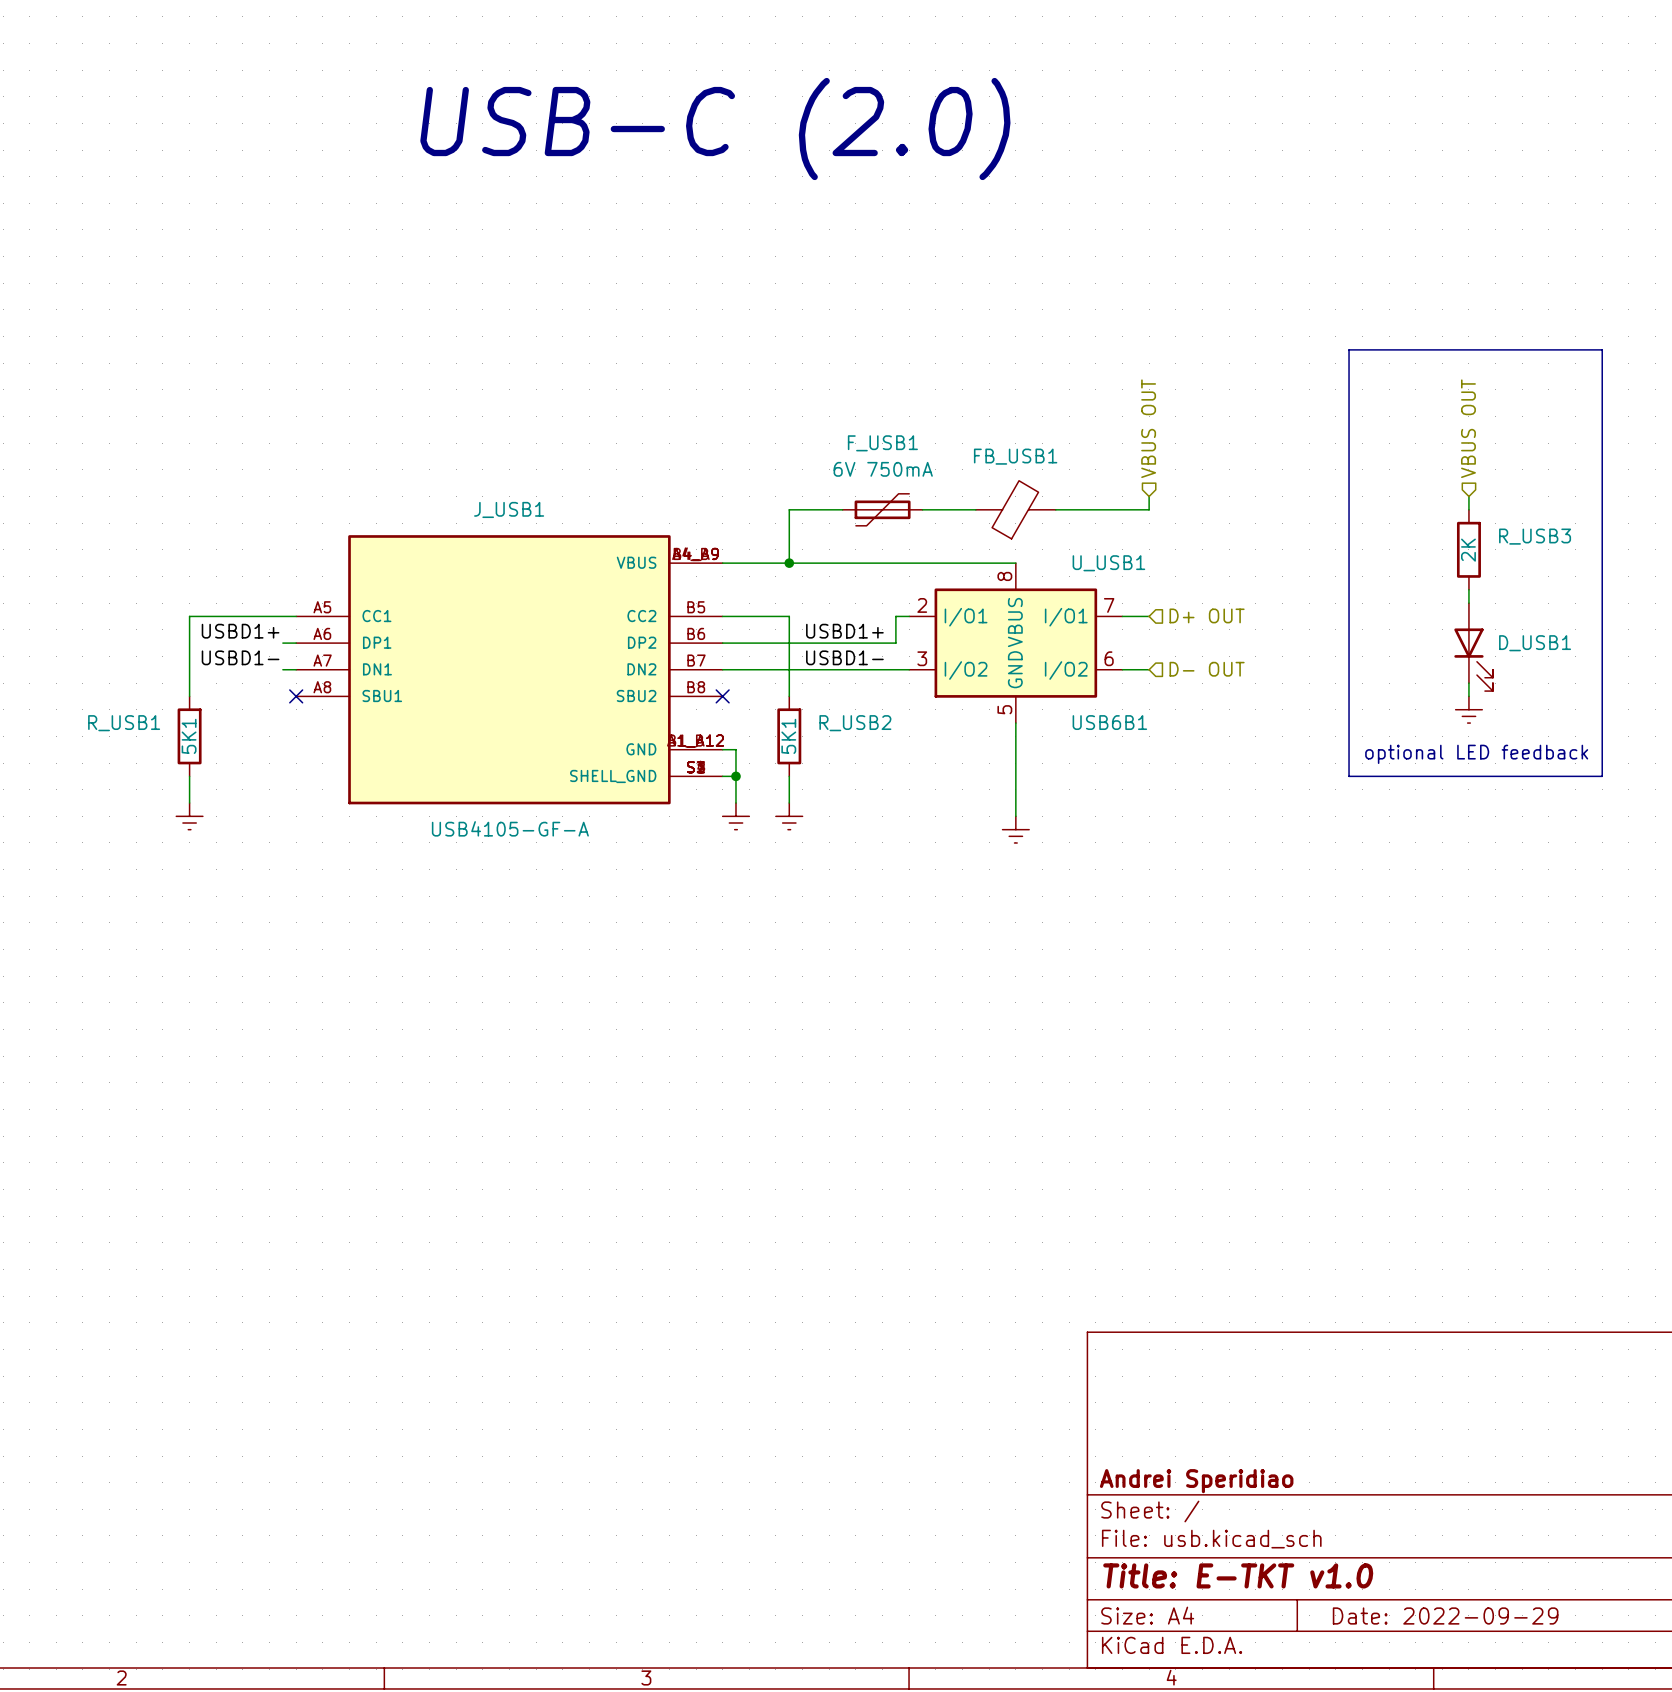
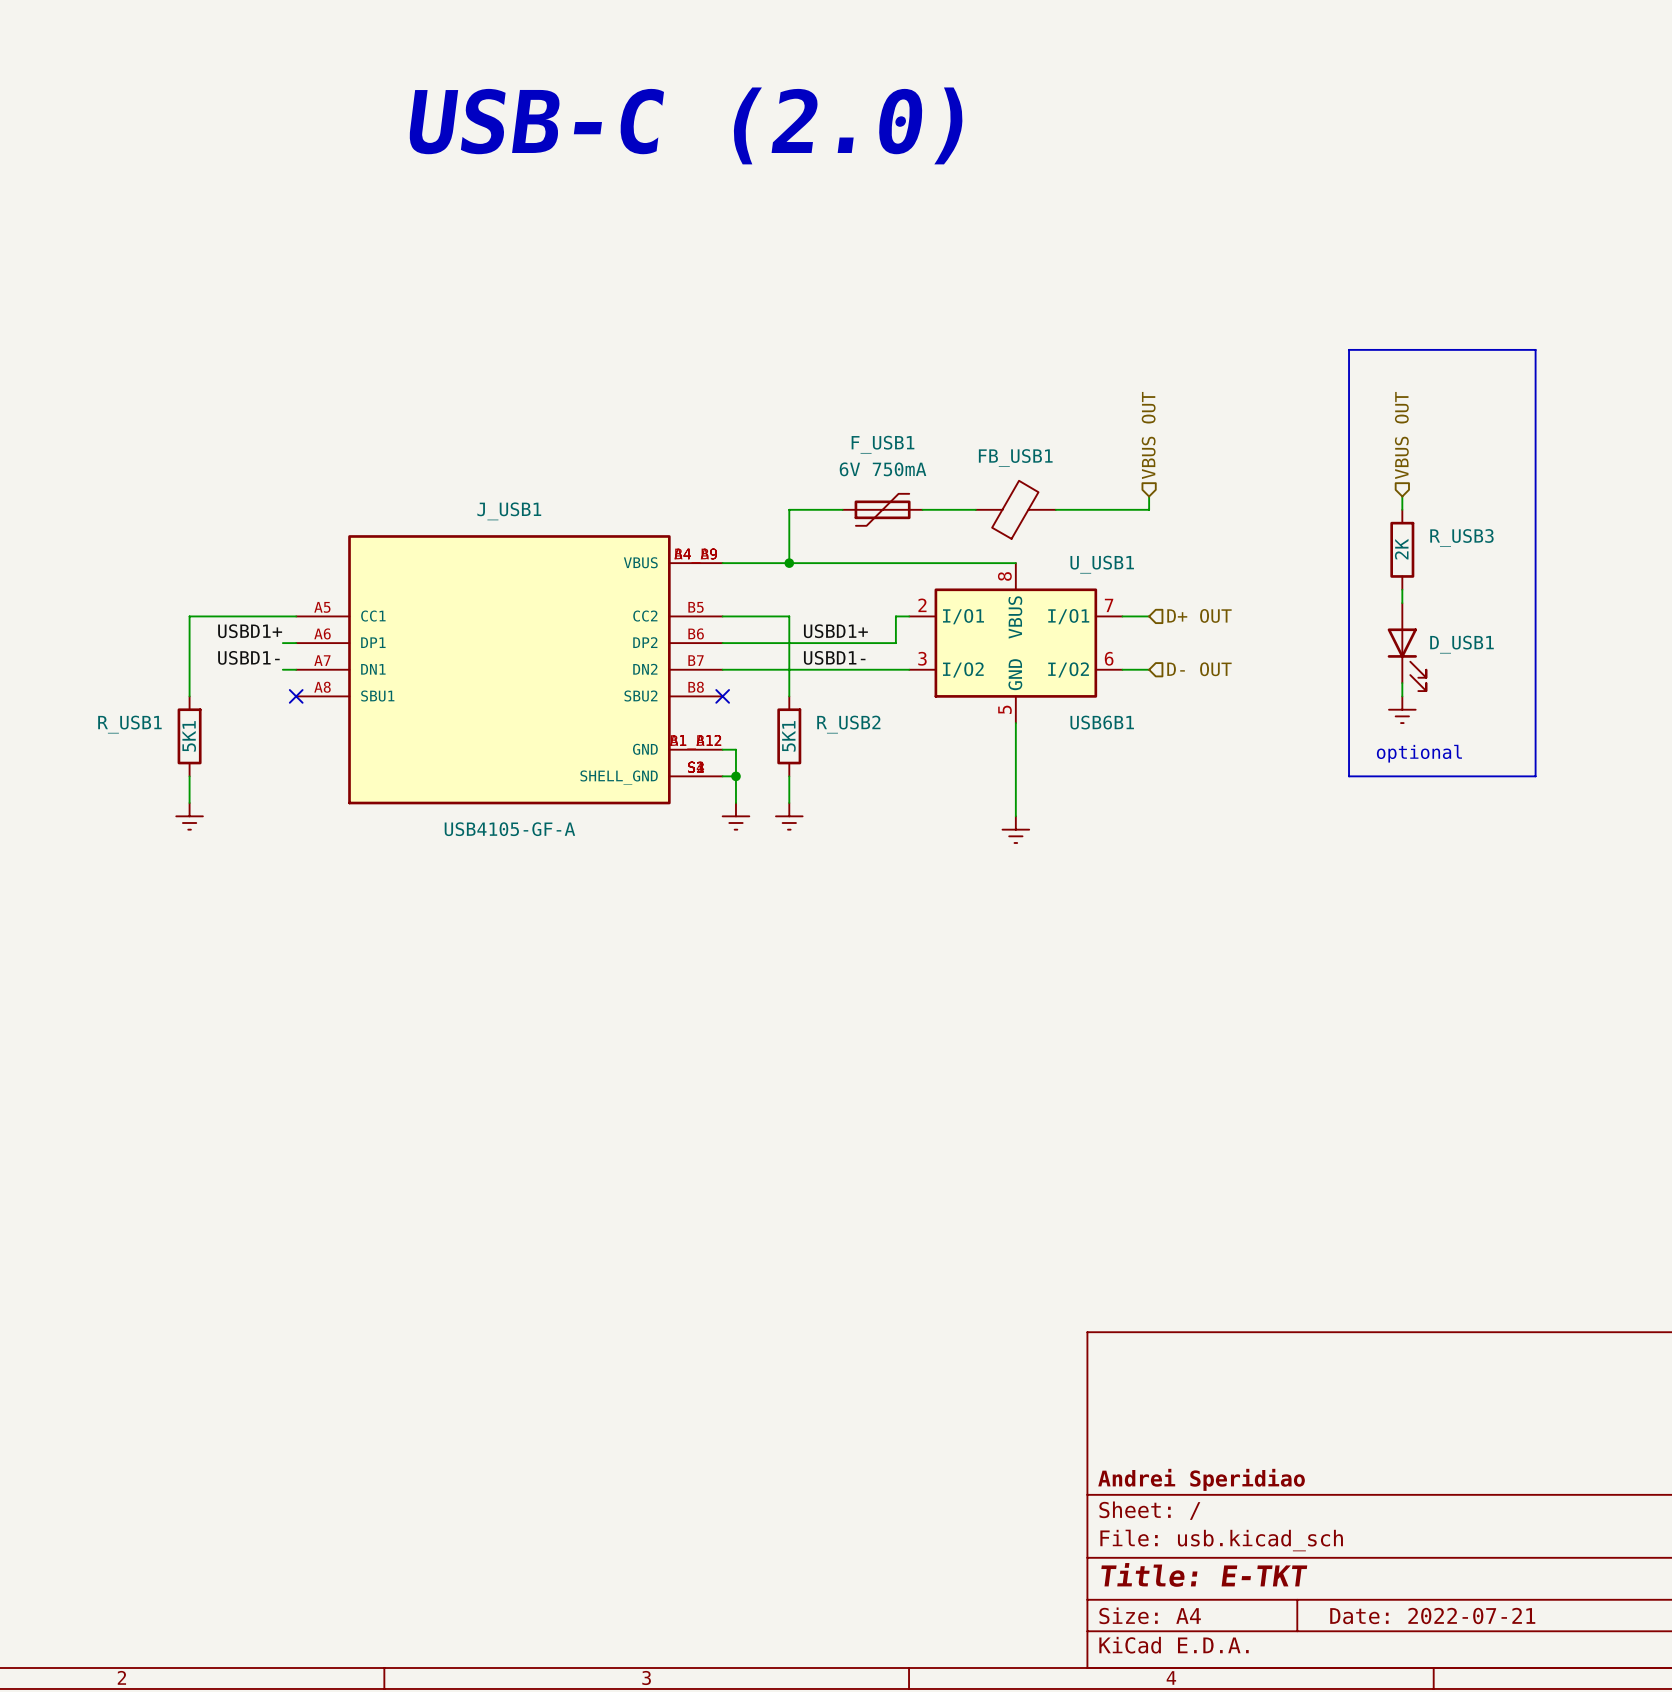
line: (1535, 349) (1602, 349) (1602, 776) (1535, 776) -> (1535, 349) (1535, 776)
hierarchical label position: VBUS OUT (1468, 428) -> VBUS OUT (1401, 435)
wire: (1468, 496) (1468, 509) -> (1402, 496) (1402, 509)
R_USB3 position: (1468, 549) -> (1402, 549)
wire: (1468, 589) (1468, 603) -> (1402, 589) (1402, 603)
D_USB1 position: (1473, 647) -> (1406, 647)
wire: (1468, 683) (1468, 696) -> (1402, 683) (1402, 696)
power symbol position: (1468, 709) -> (1402, 709)
text: none -> optional (1419, 753)
text: optional LED feedback (1476, 754) -> none
title block: Title: E-TKT v1.0 (1238, 1575) -> Title: E-TKT (1204, 1574)
title block: Date: 2022-09-29 (1445, 1615) -> Date: 2022-07-21 (1432, 1616)

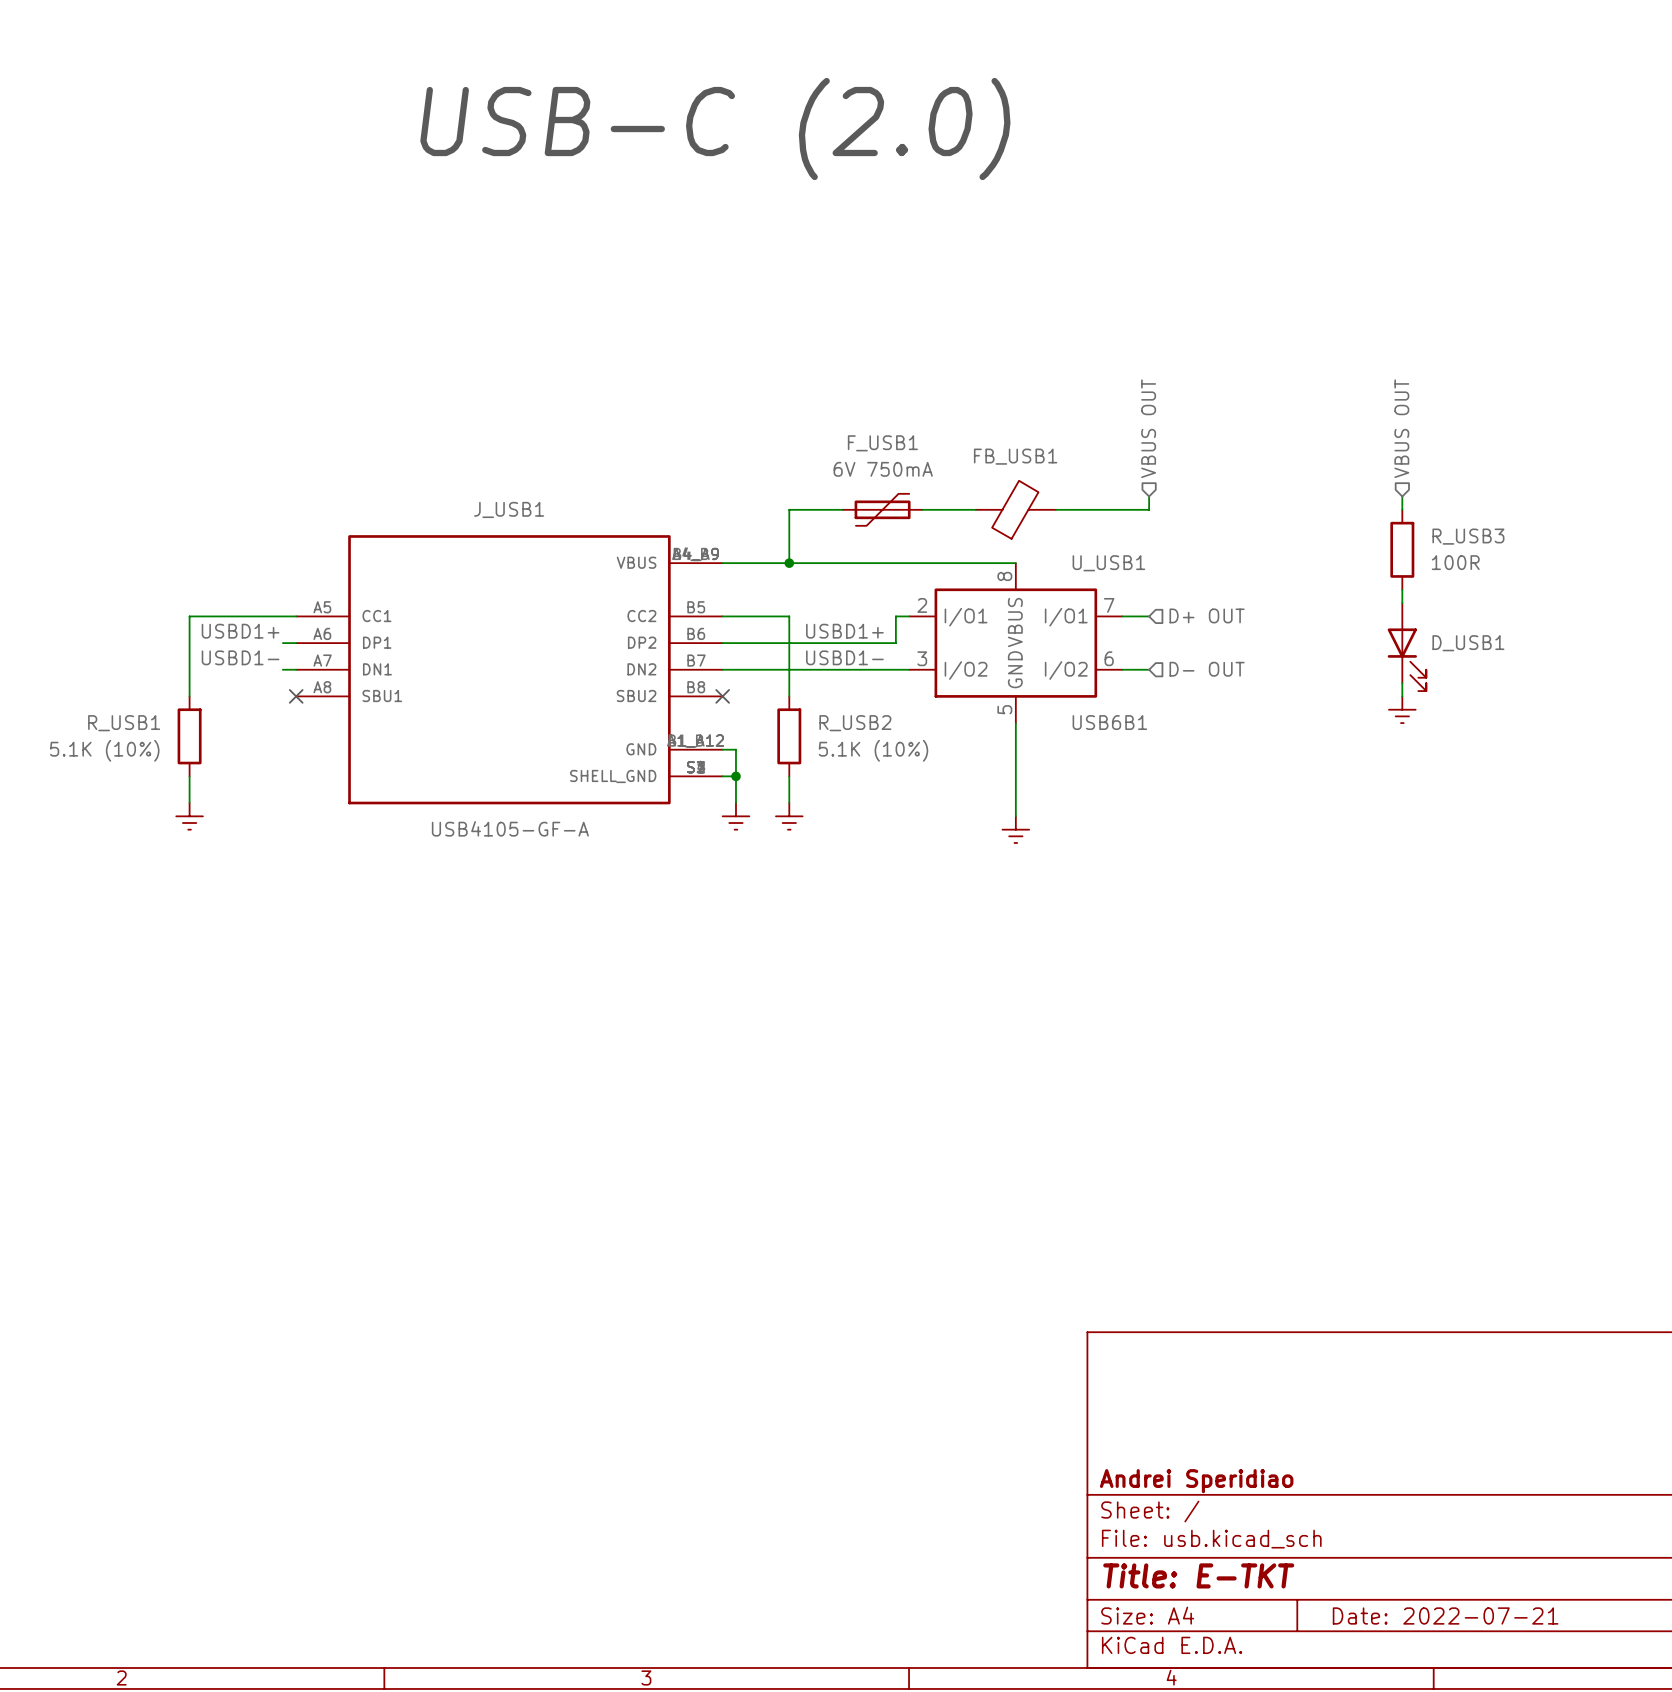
line: (1349, 349) (1535, 349) (1535, 776) (1349, 776) (1349, 349) -> none
R_USB3 value: 2K (1401, 549) -> 100R (1455, 562)
R_USB1 value: 5K1 (189, 736) -> 5.1K (10%) (104, 750)
R_USB2 value: 5K1 (788, 736) -> 5.1K (10%) (873, 750)
text: optional (1419, 753) -> none

